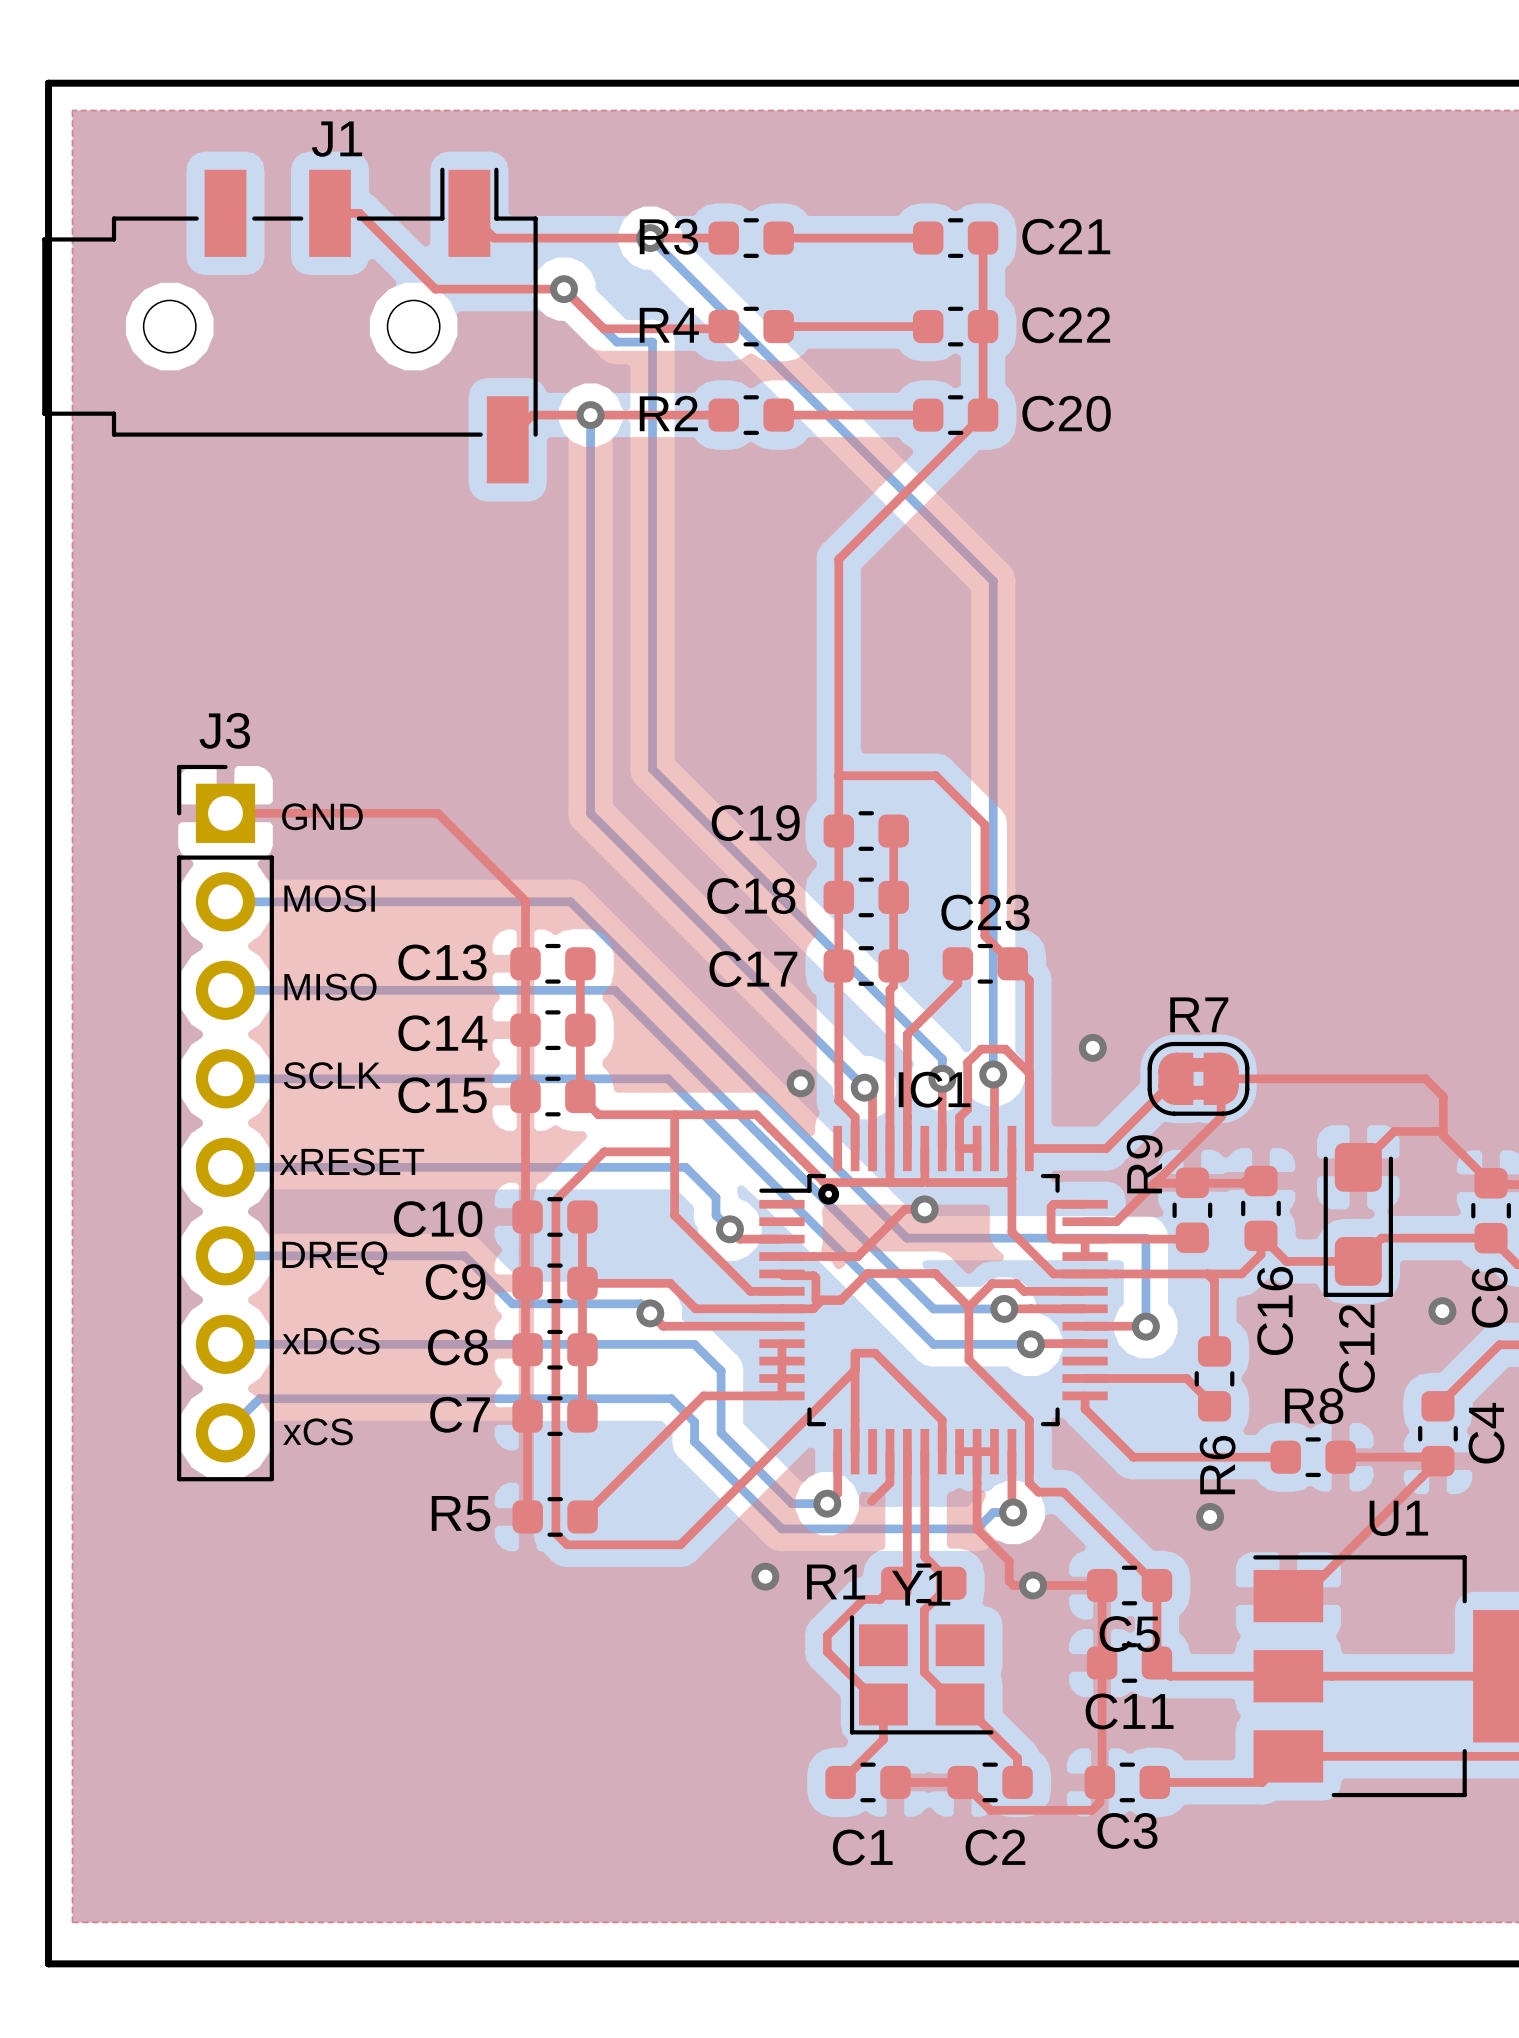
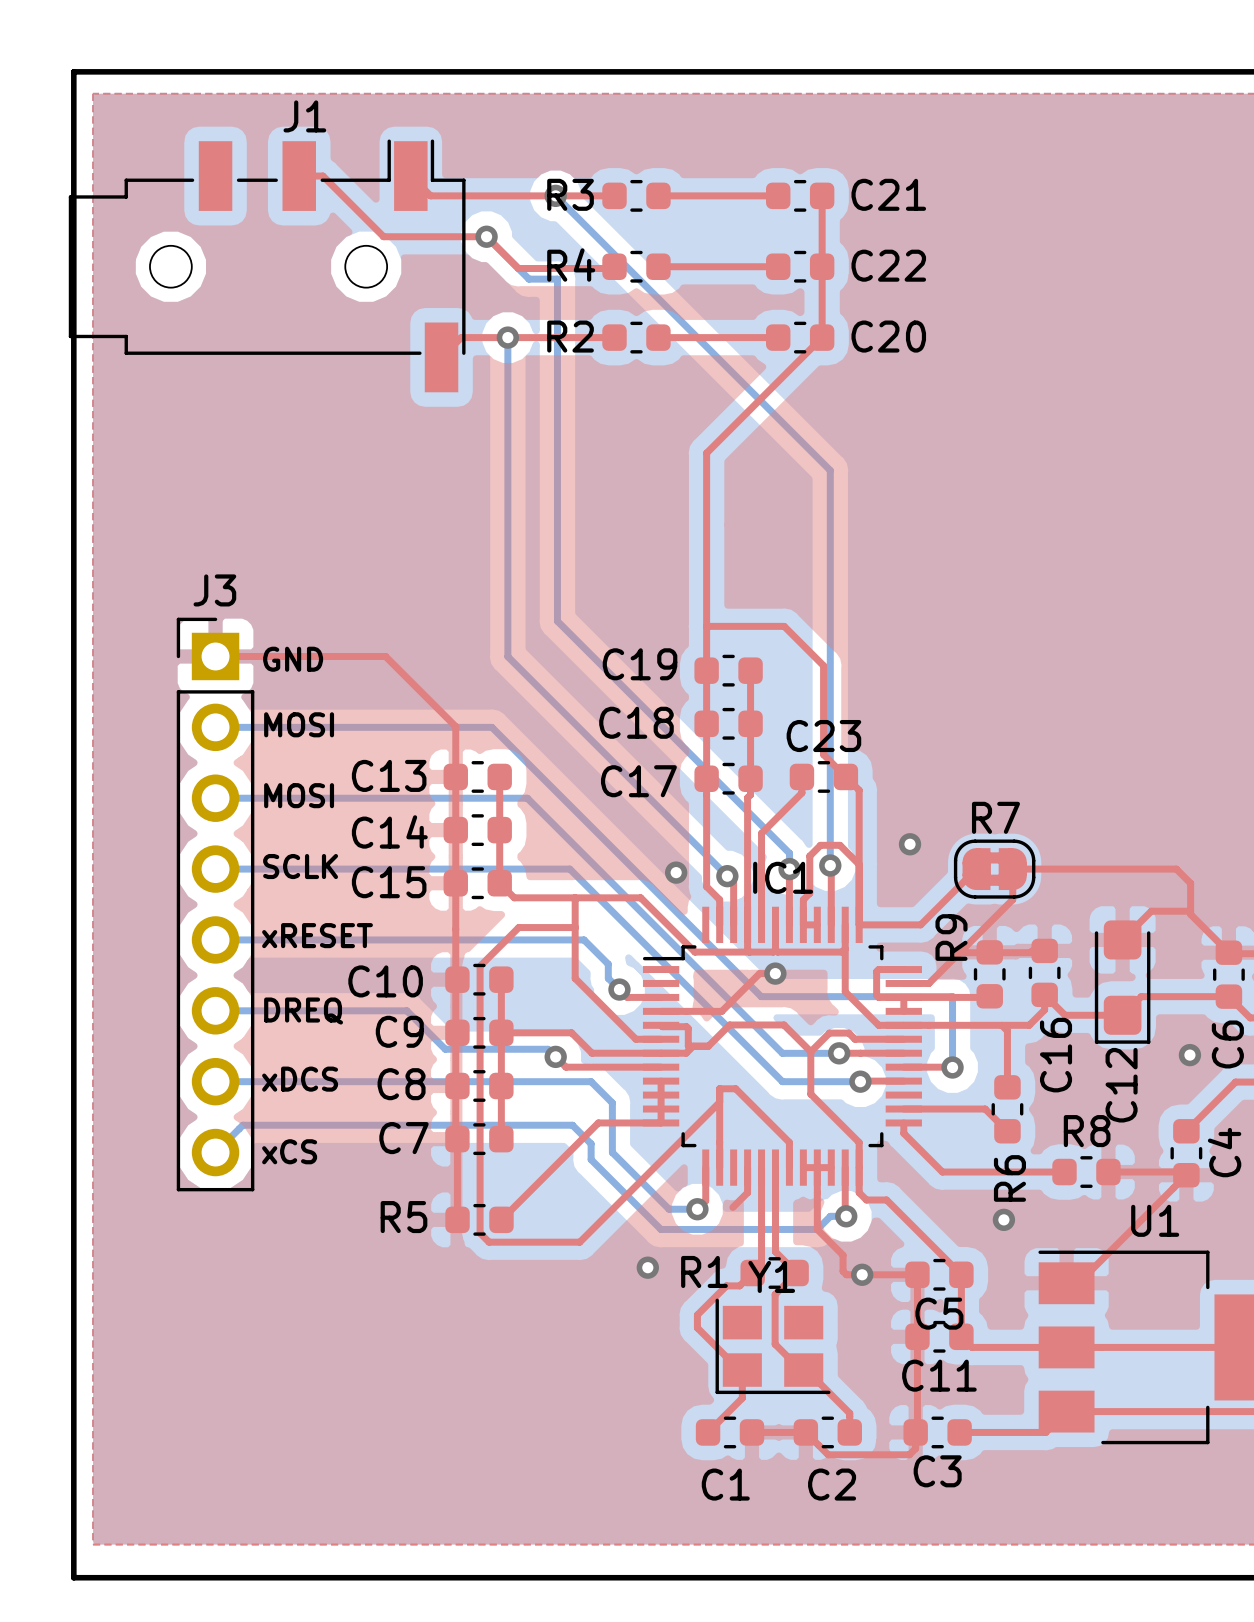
text: MISO (330, 987) -> MOSI (299, 795)
drawing: [818, 1183, 840, 1205] -> none

